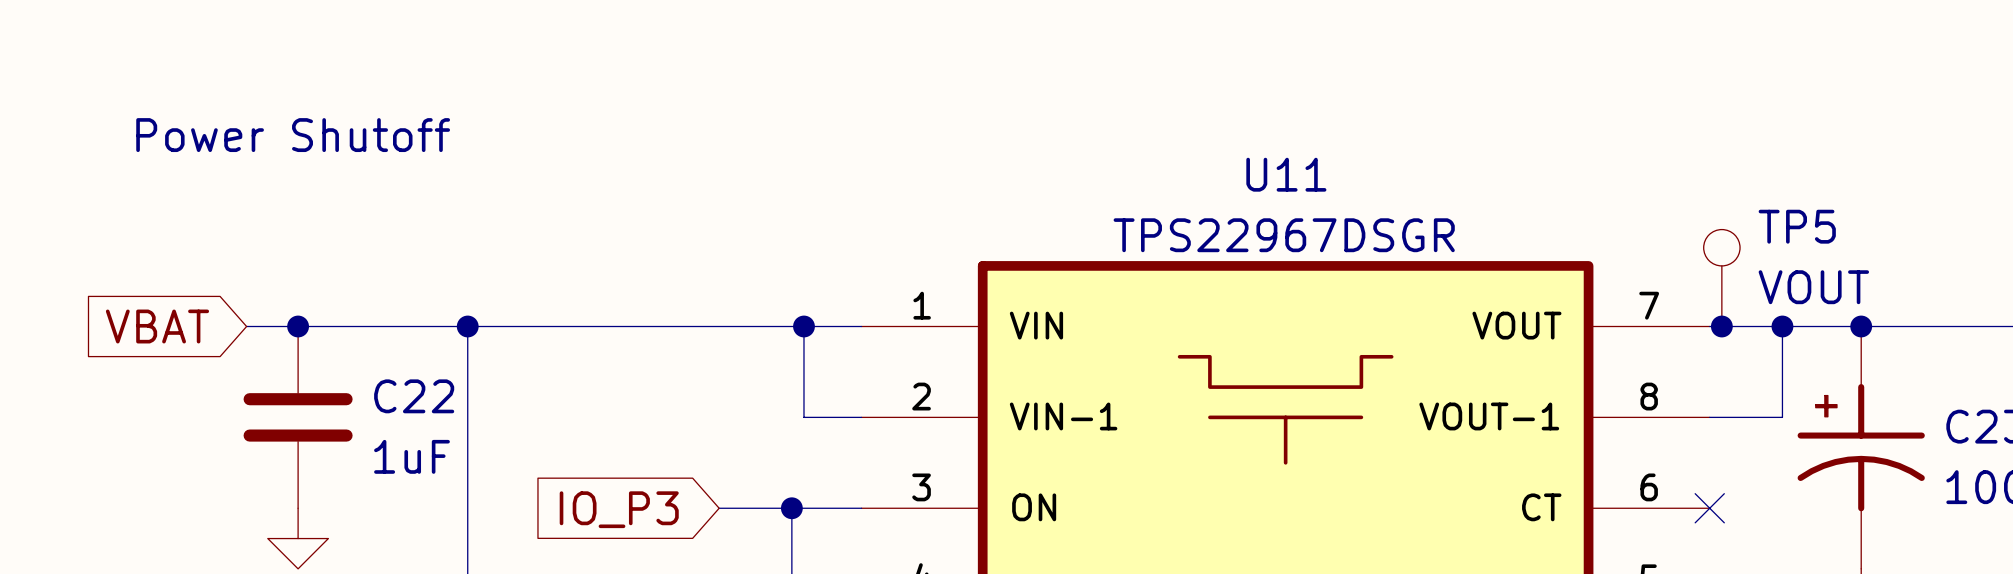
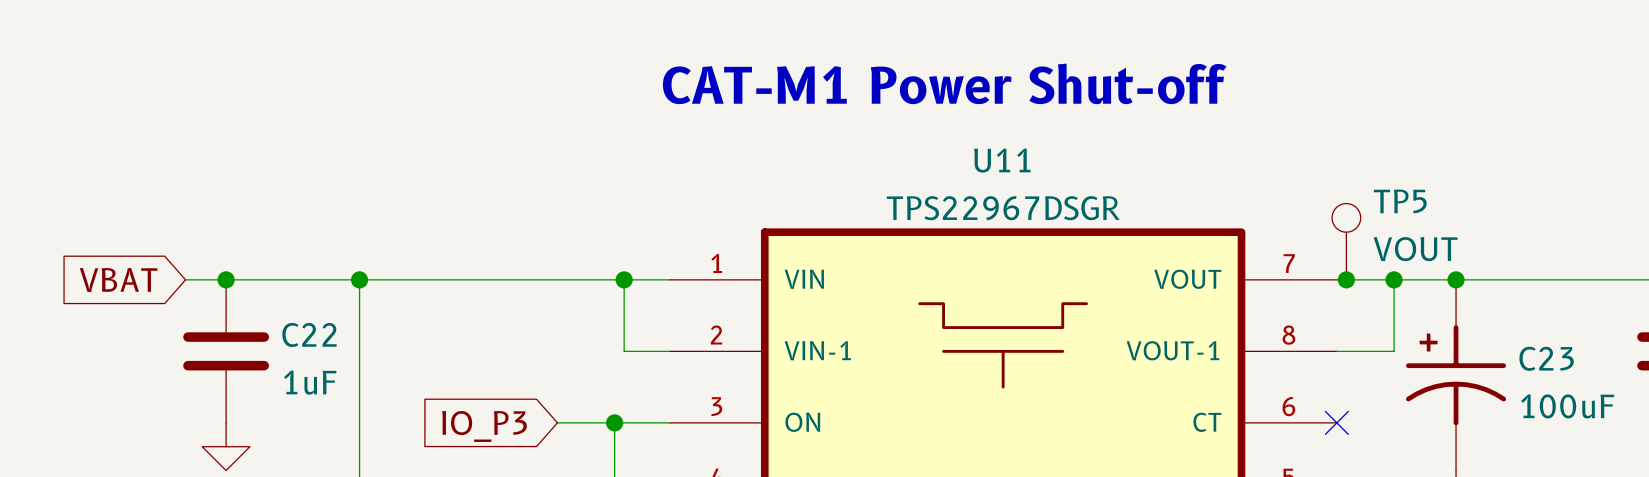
text: none -> CAT-M1 Power Shut-off (944, 83)
text: Power Shutoff (293, 135) -> none

